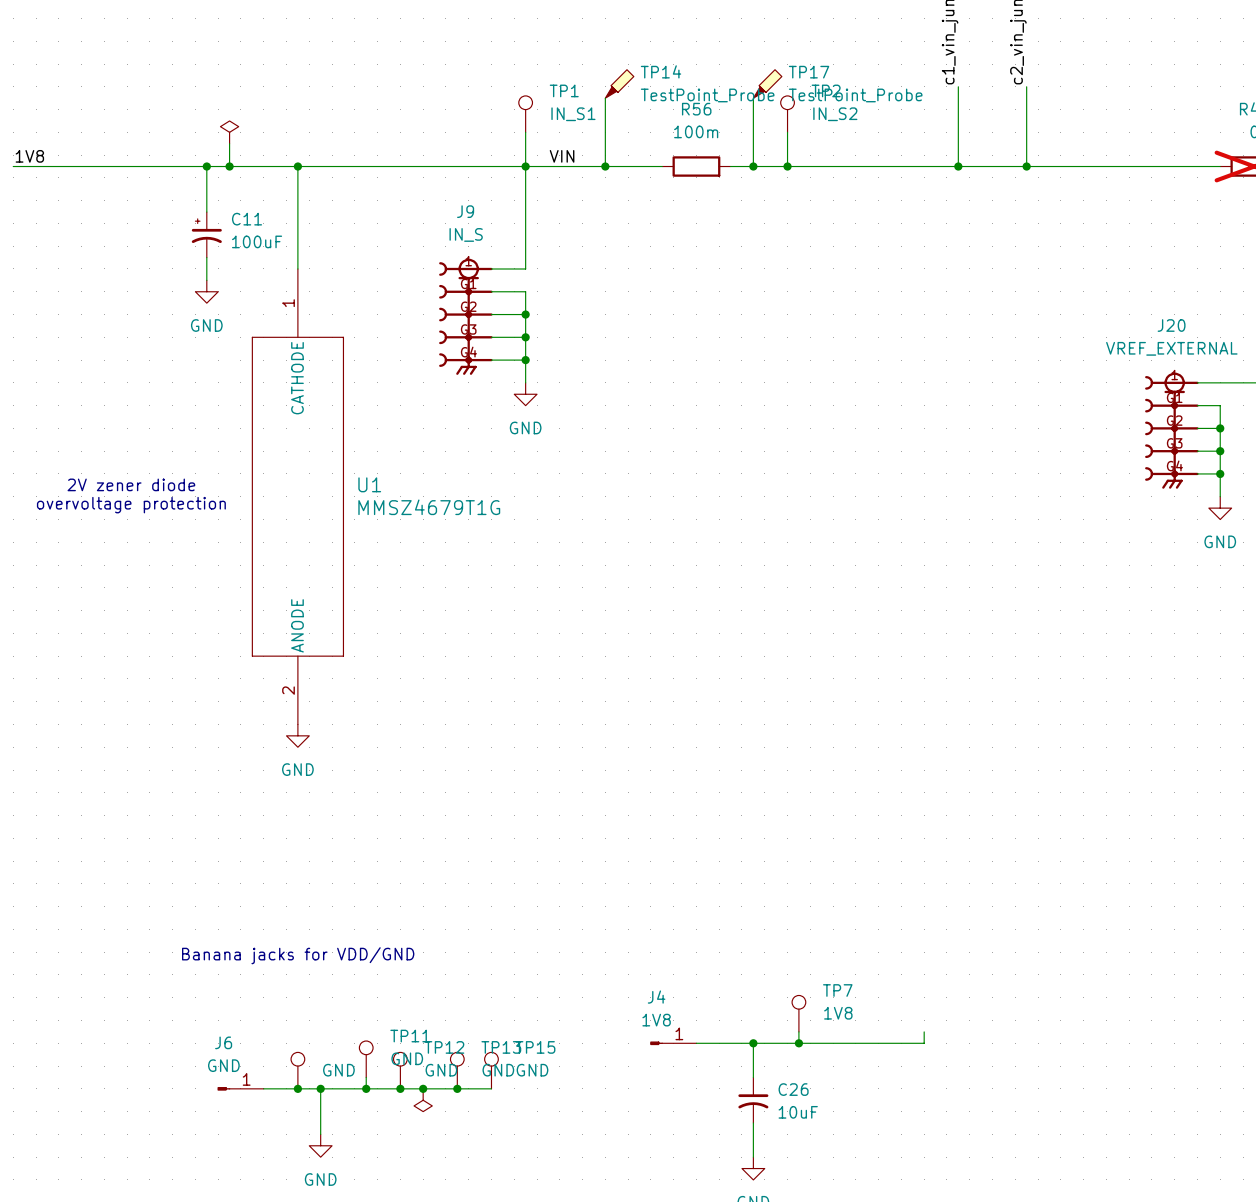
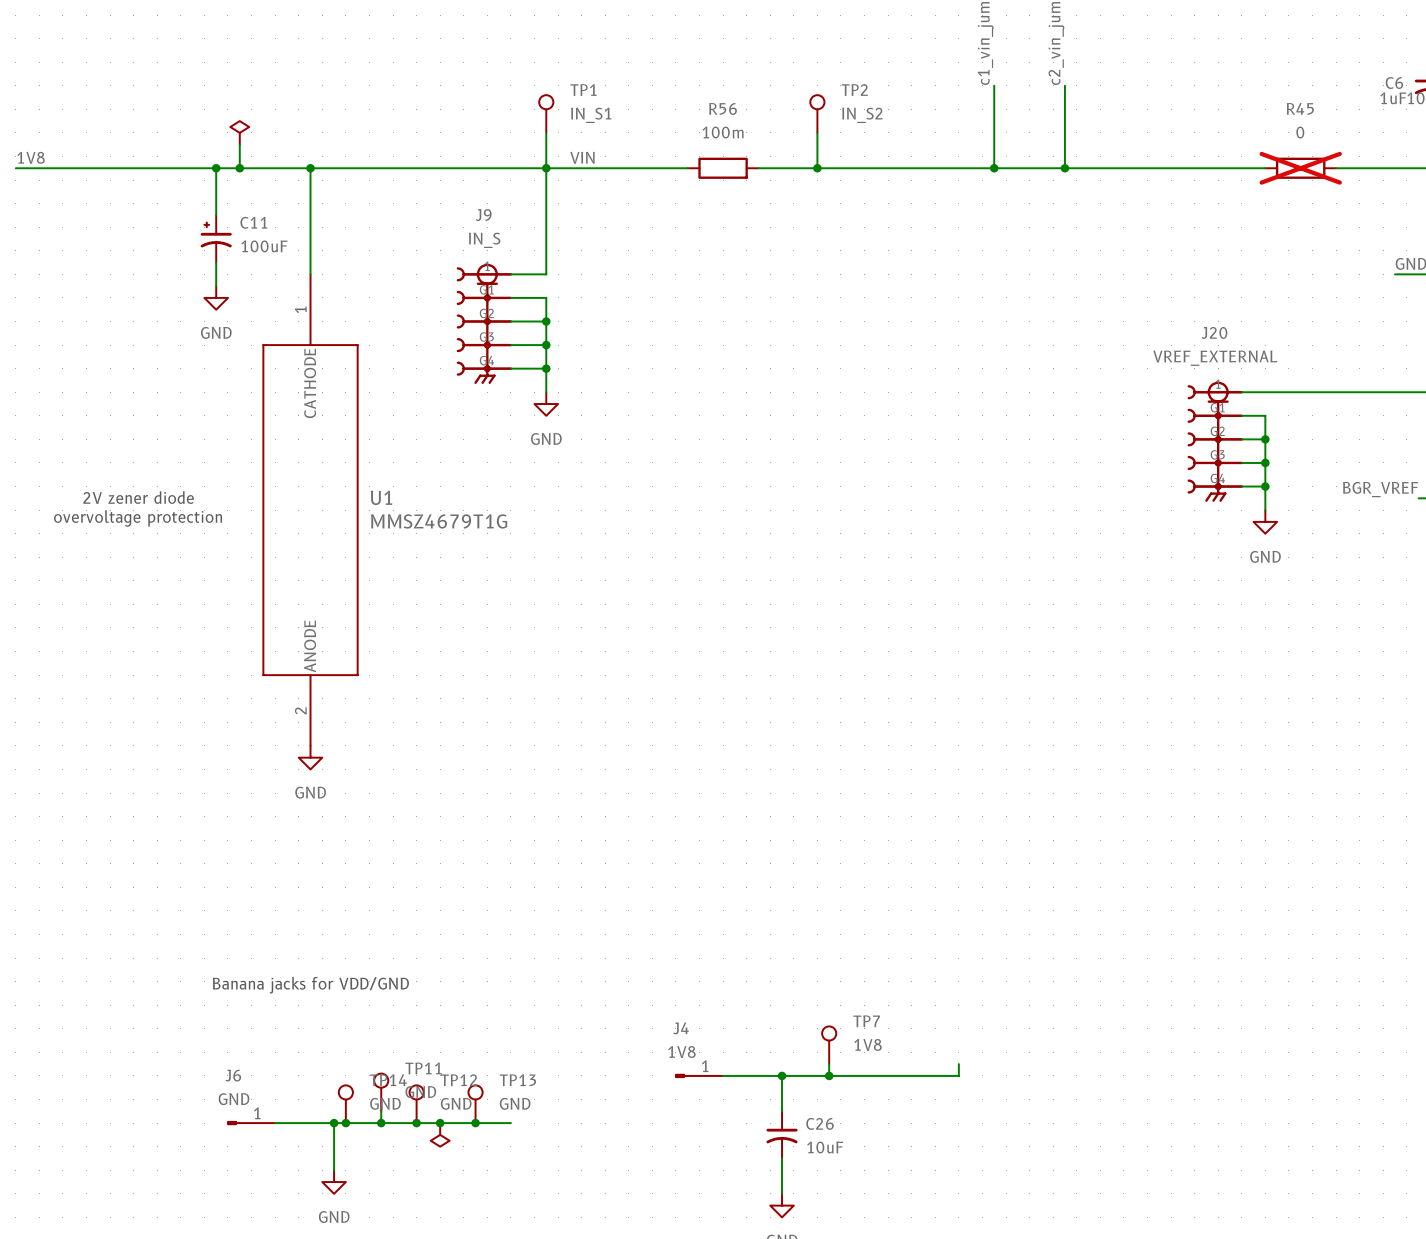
TP14 symbol: [605, 69, 634, 99] -> [338, 1085, 353, 1124]
TP17: TestPoint_Probe (767, 83) -> none
TP14 value: TestPoint_Probe (707, 95) -> GND (385, 1103)
wire: (605, 98) (605, 166) -> none
wire: (753, 98) (753, 166) -> none
junction: (605, 166) -> none
junction: (753, 166) -> none
part: GND (297, 1070) -> none
TP15: GND (491, 1070) -> none
junction position: (297, 1088) -> (345, 1123)

